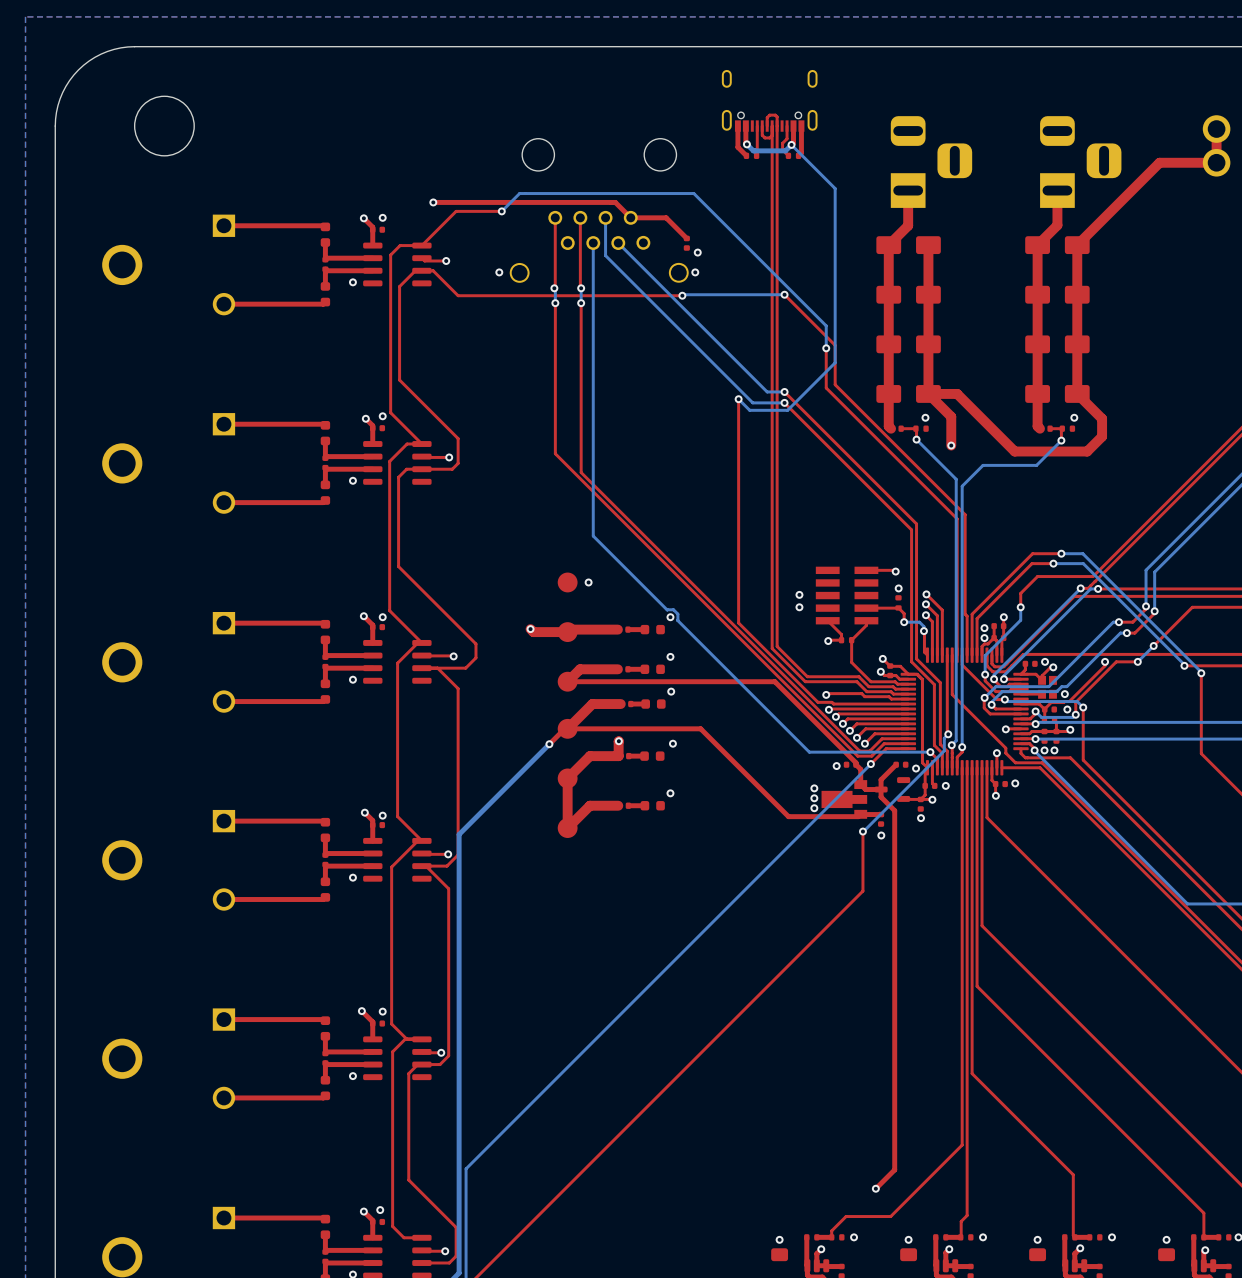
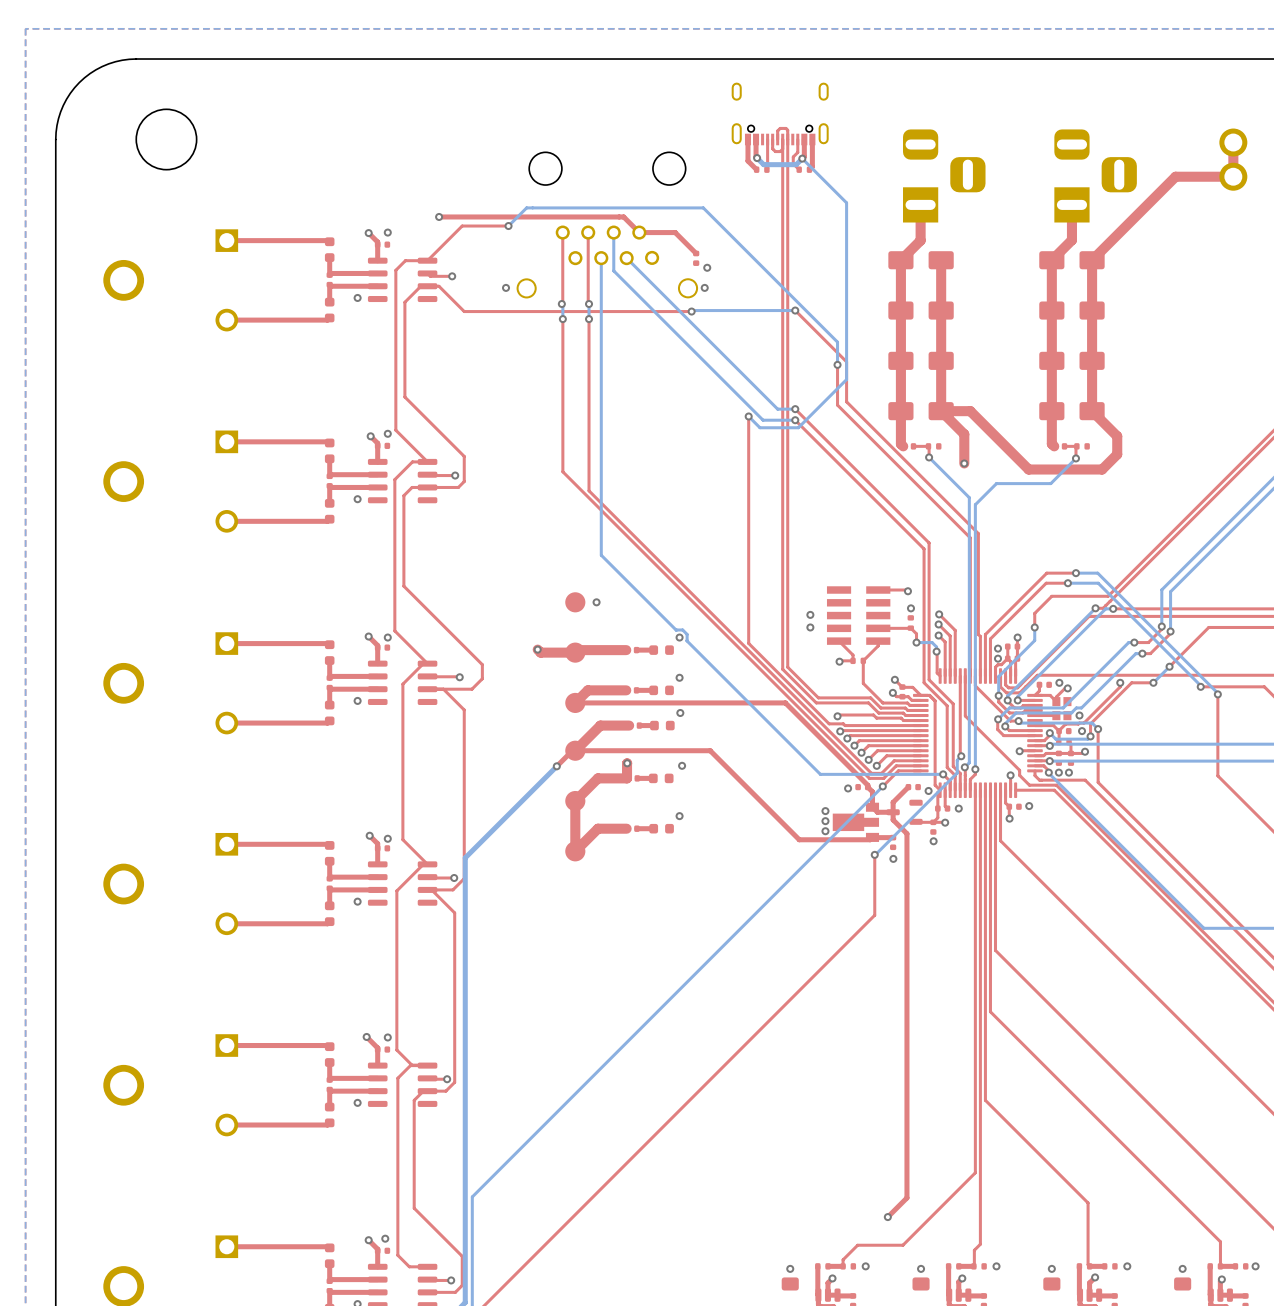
via: (925, 417) -> none
via: (1074, 417) -> none

